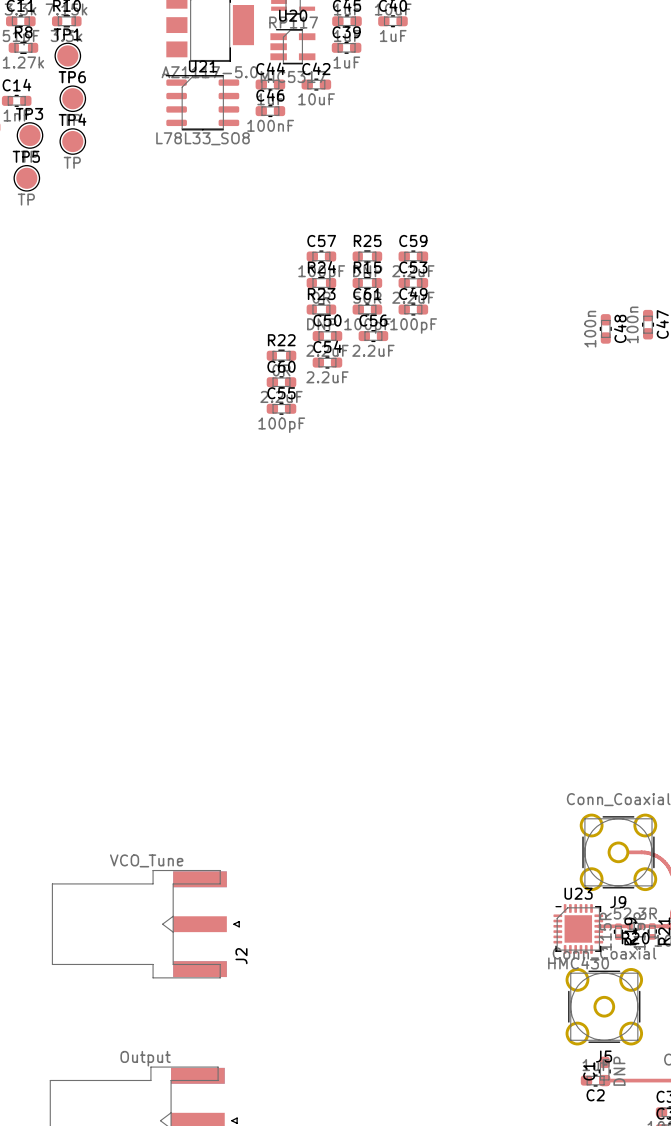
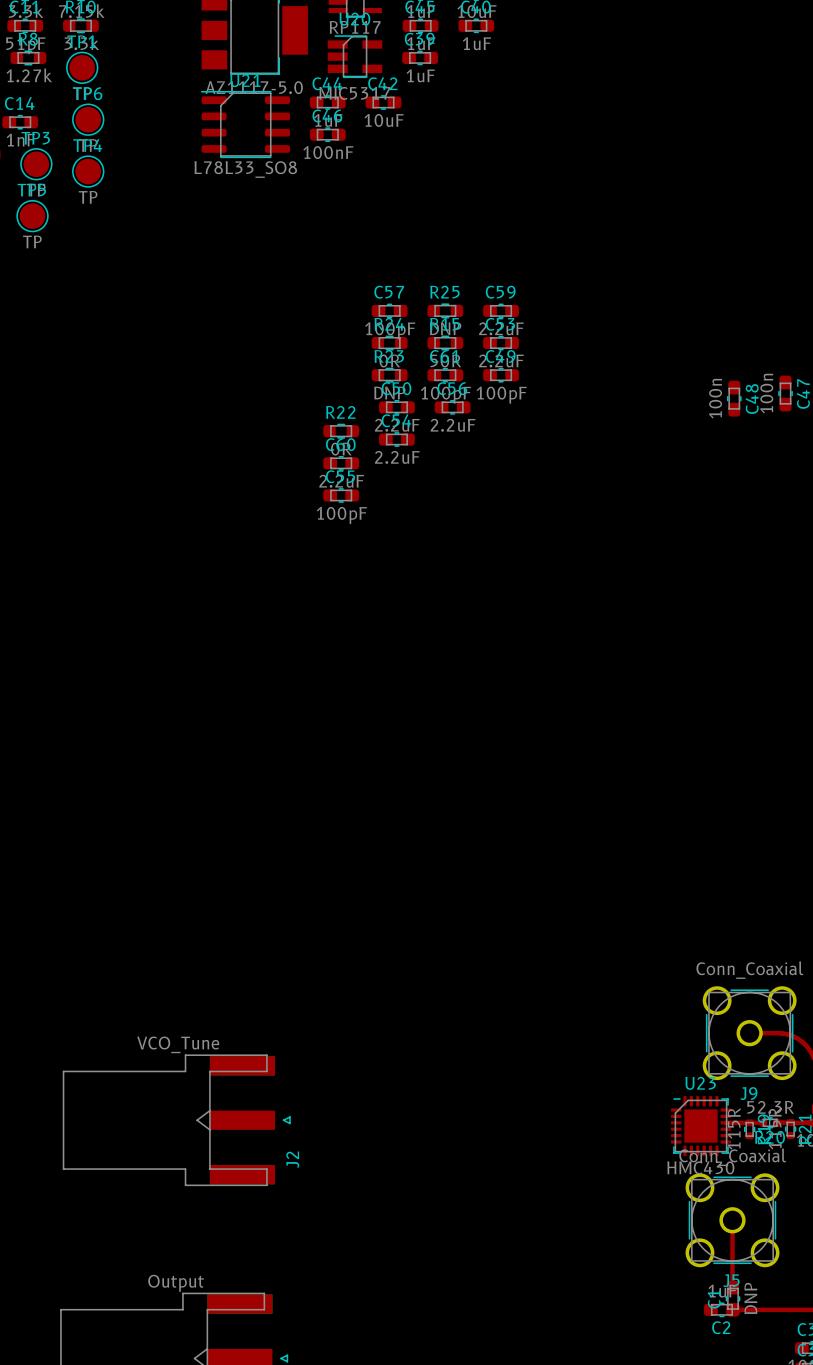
top track: none -> (732, 1220) (733, 1289)

